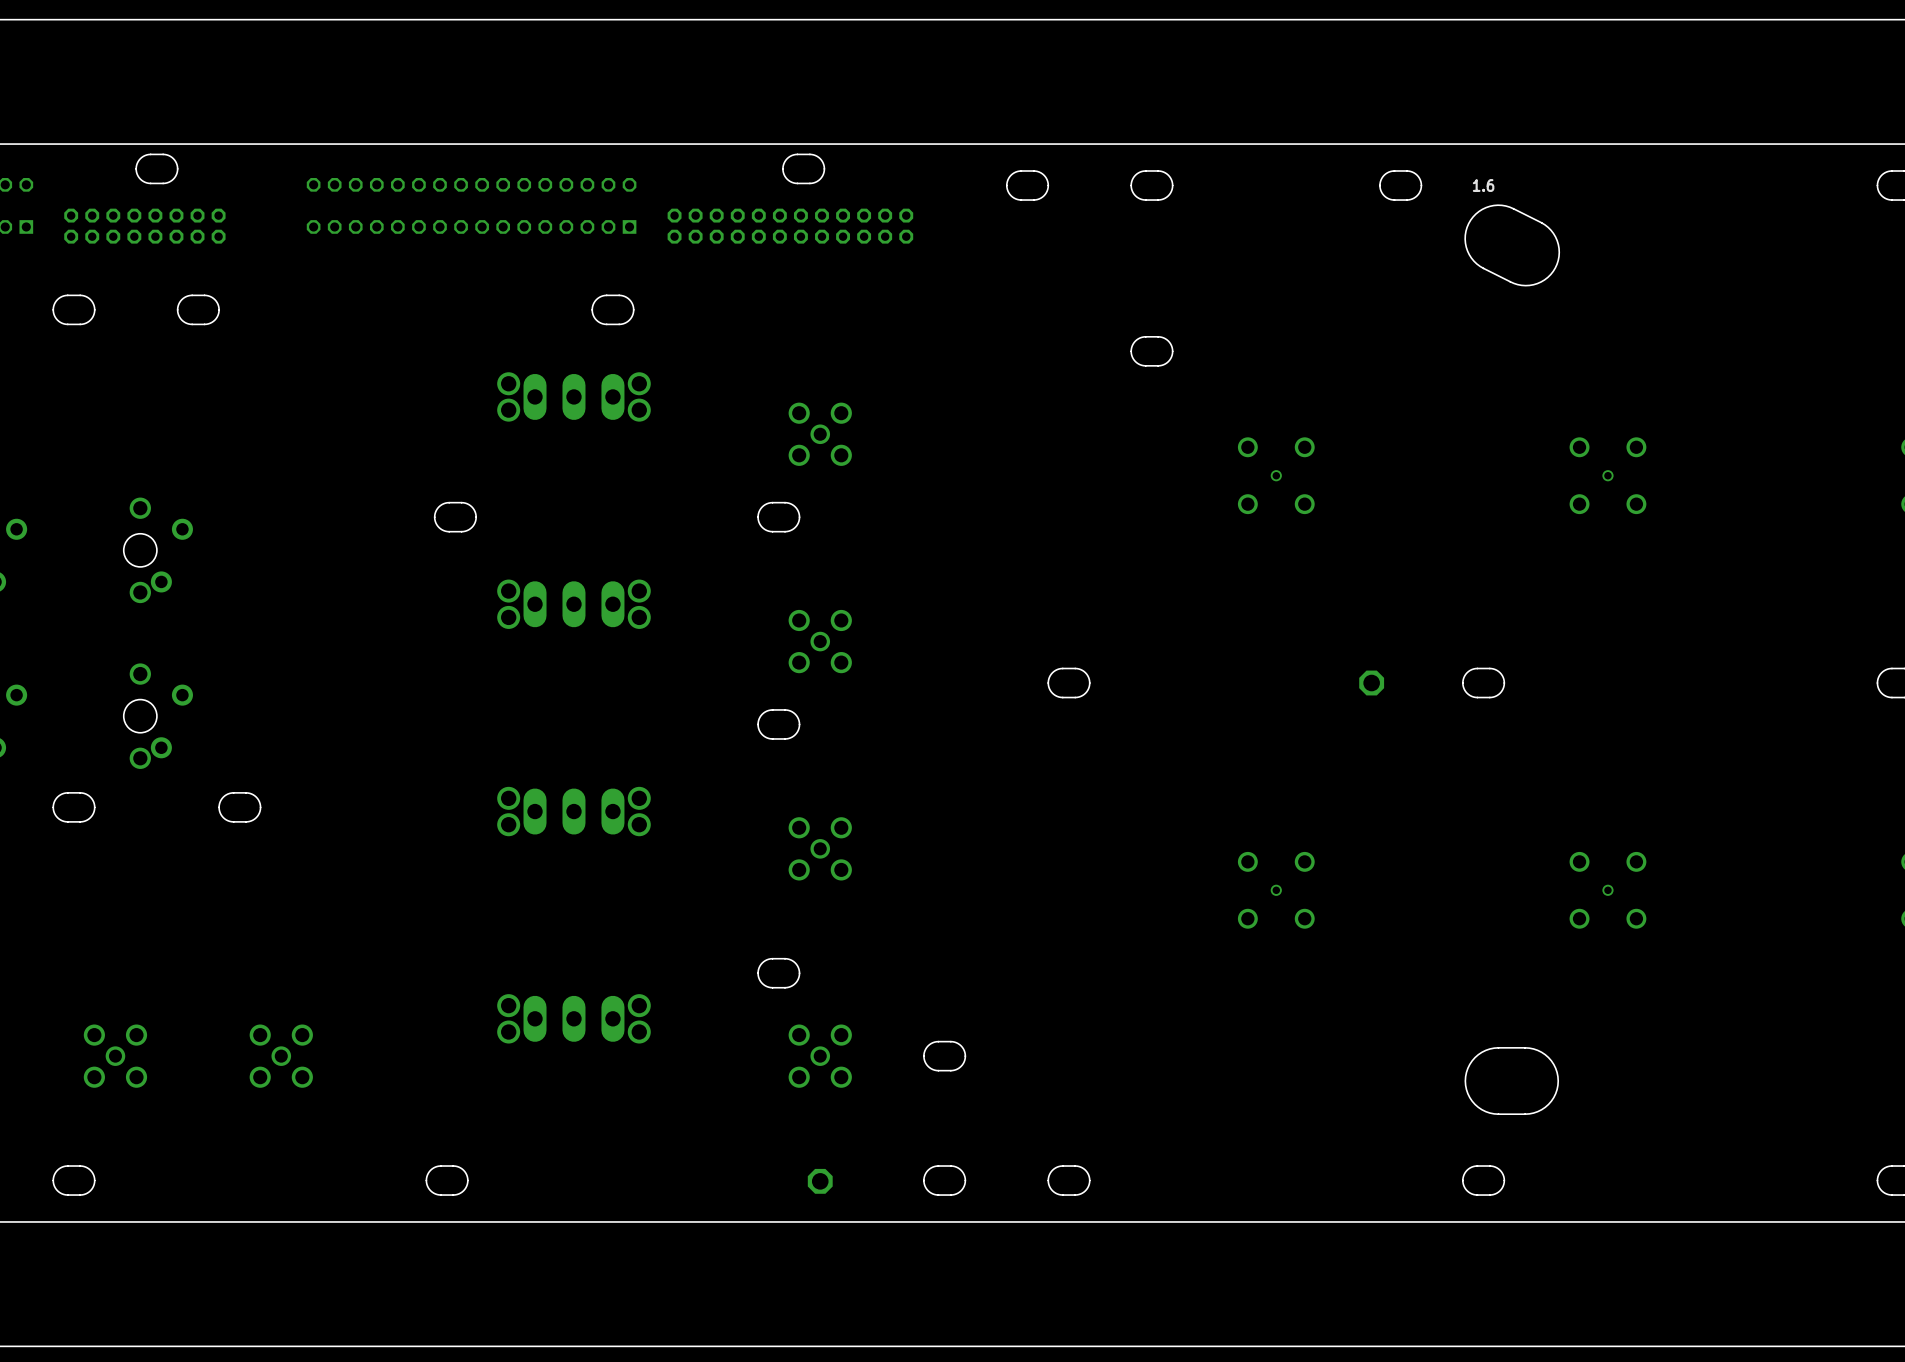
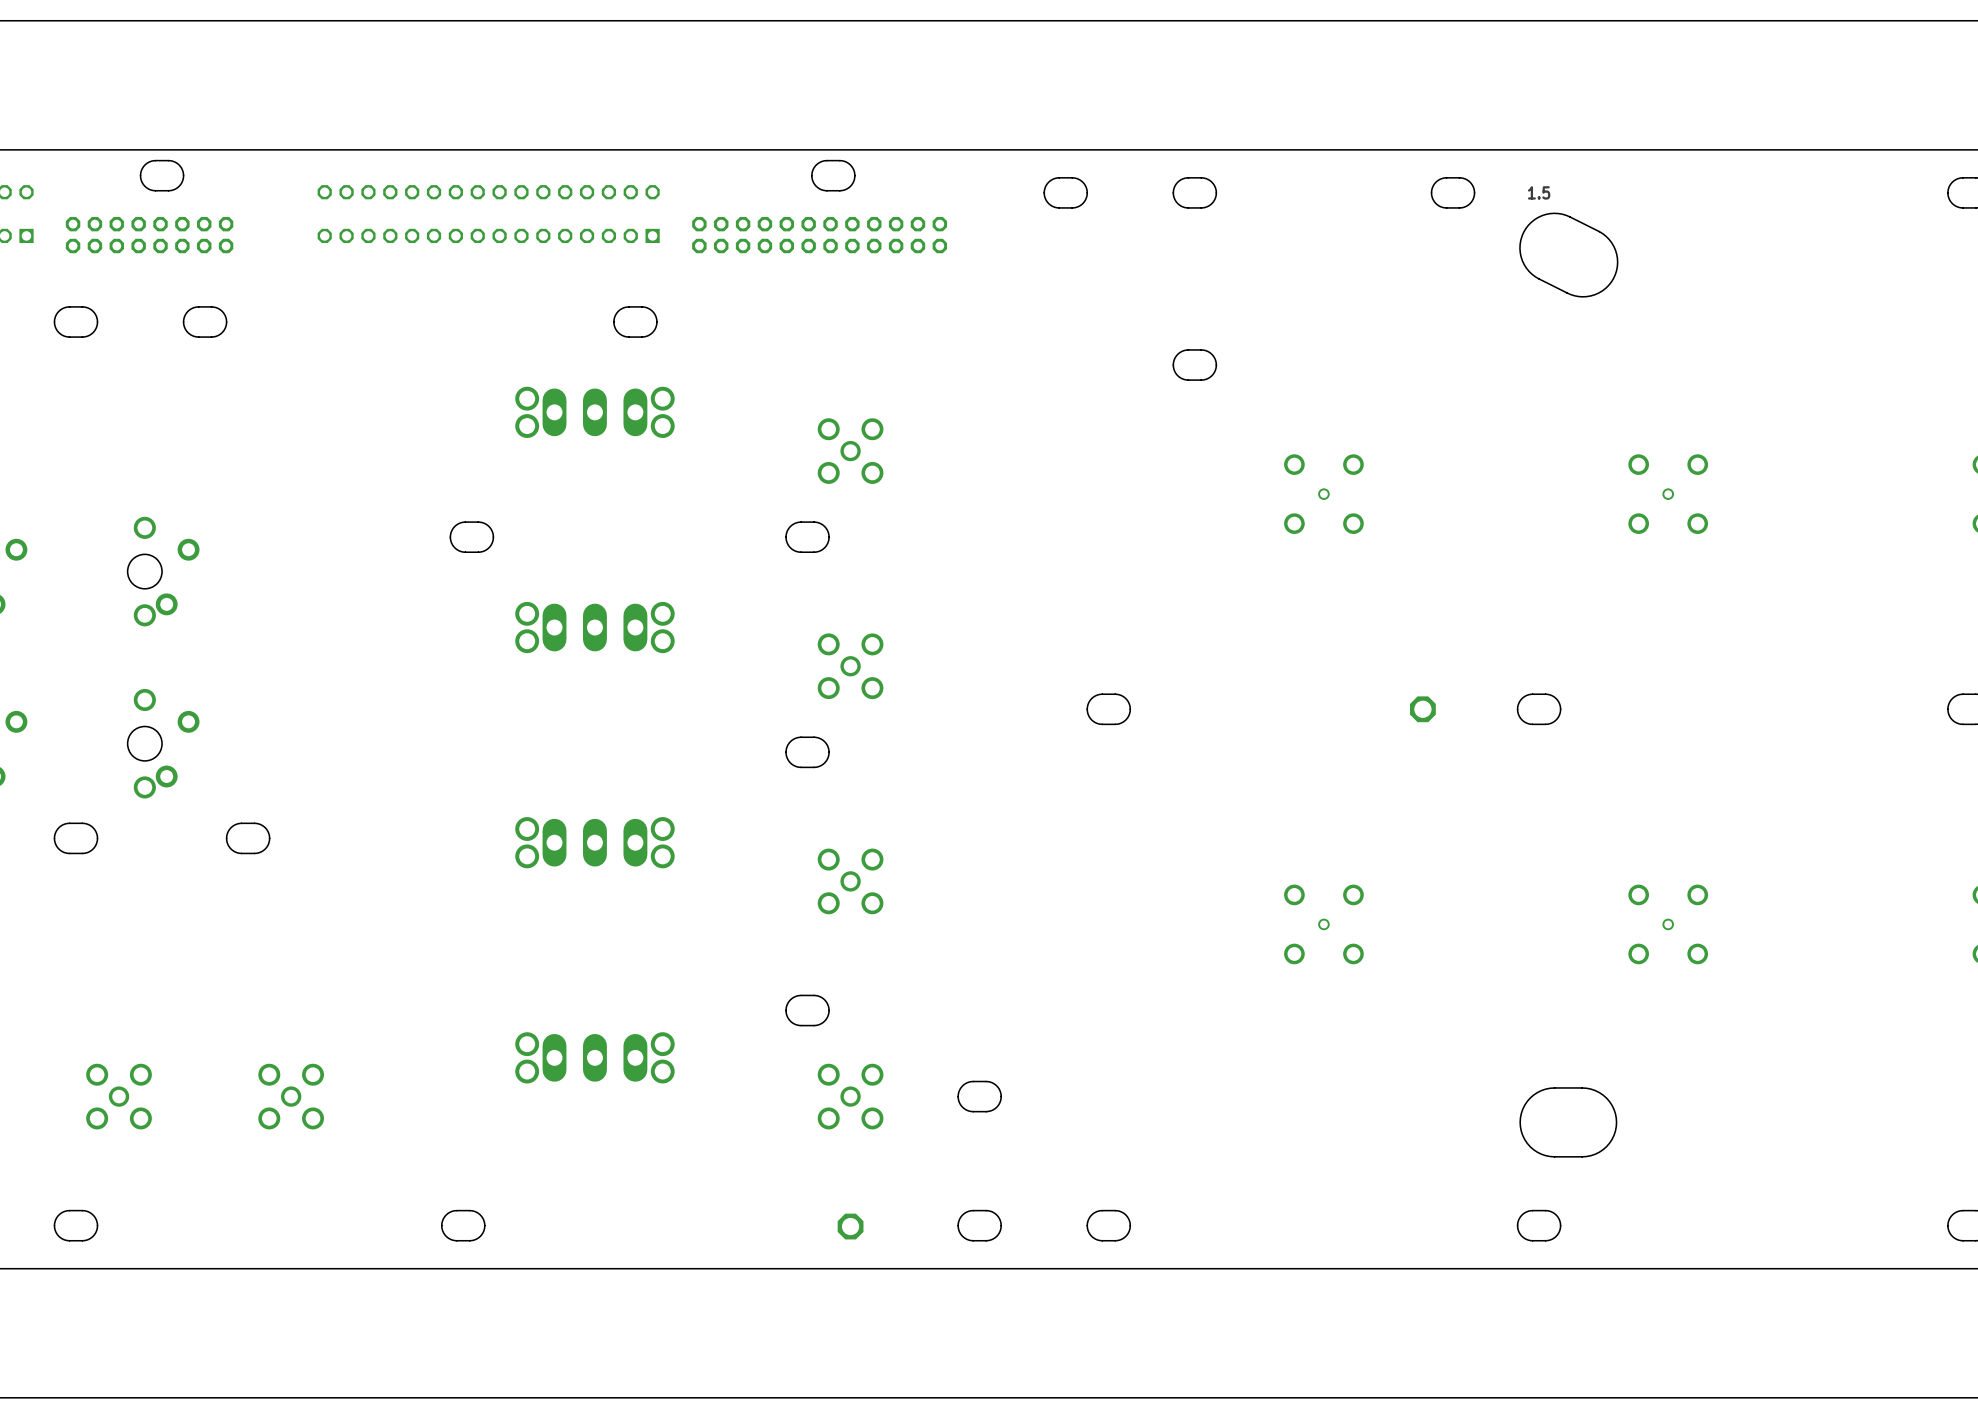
text: 1.6 (1483, 185) -> 1.5 (1539, 192)

